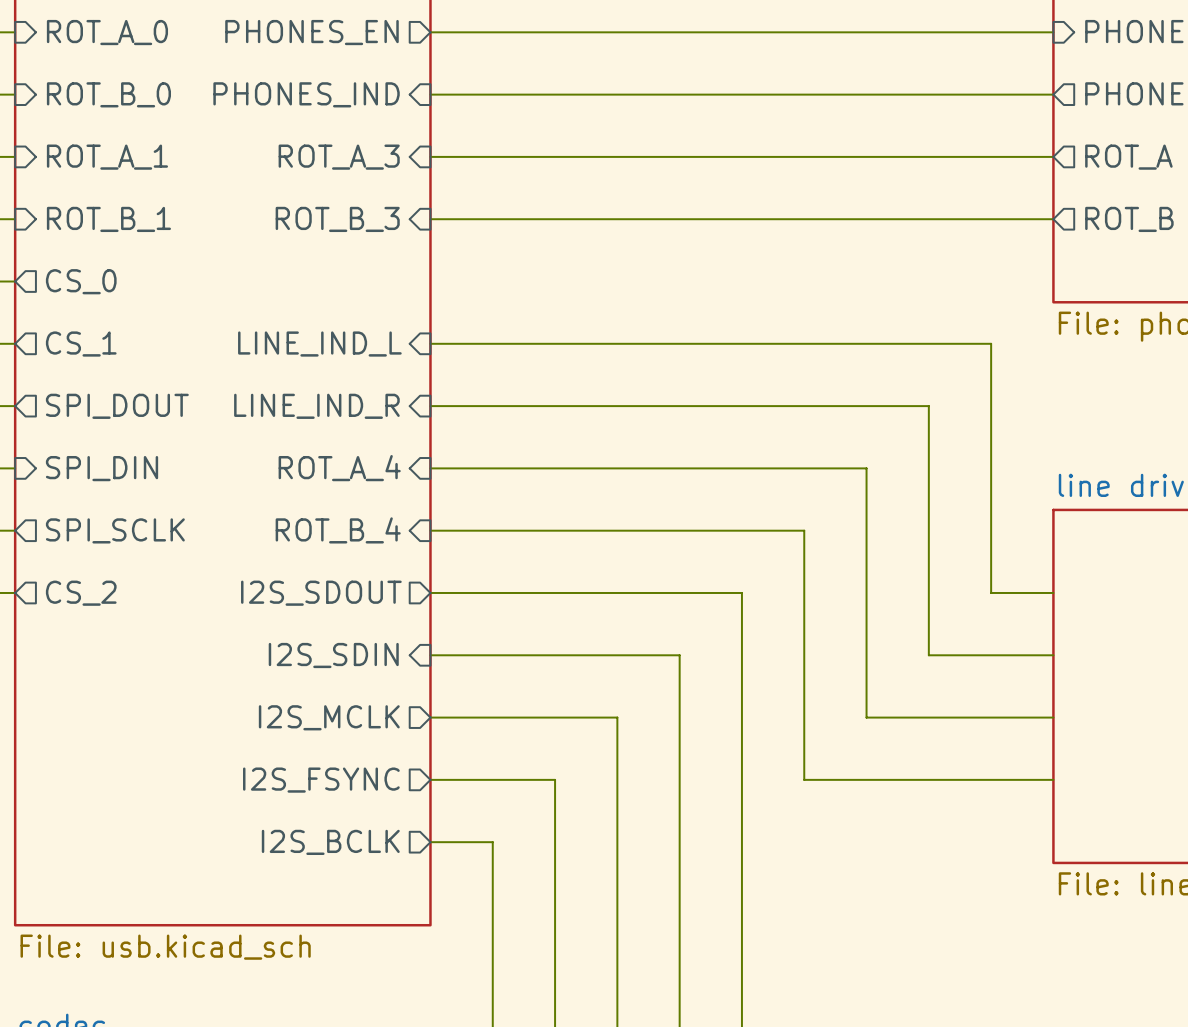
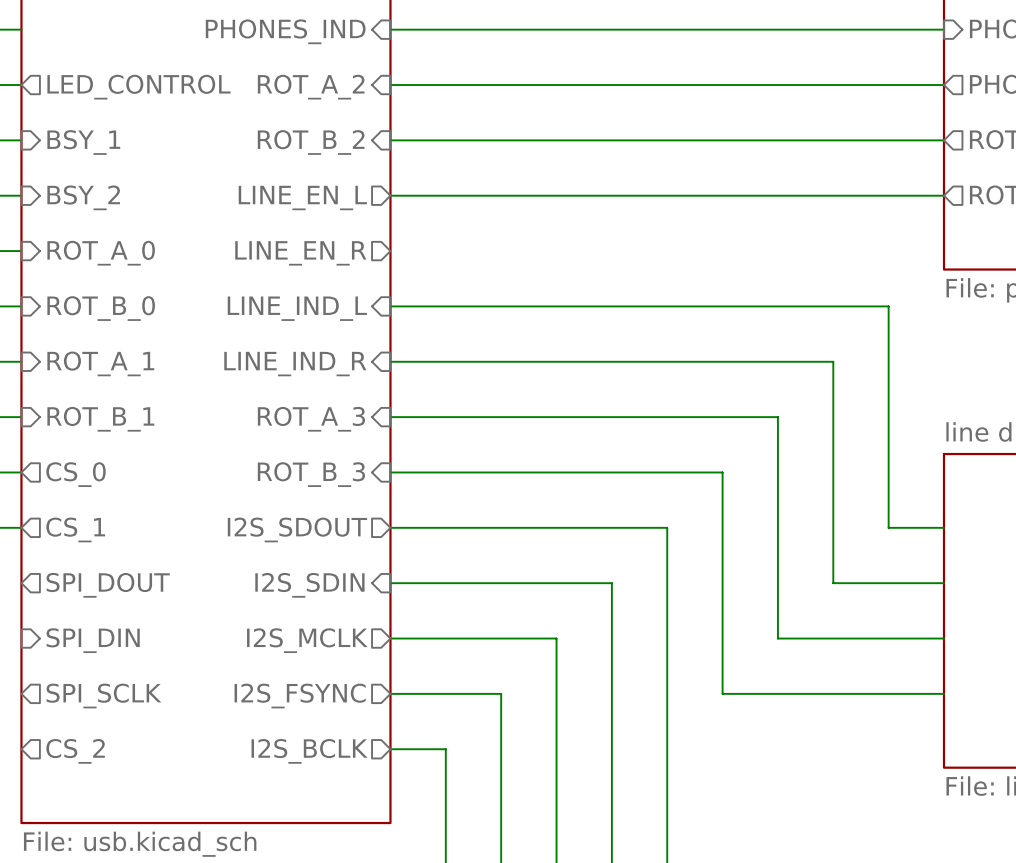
sheet pin: ROT_A_0 (107, 32) -> none
sheet pin shape: output (311, 32) -> input (285, 31)
sheet pin: PHONES_EN (311, 32) -> PHONES_IND (285, 31)
sheet pin shape: input (108, 94) -> output (138, 87)
sheet pin: ROT_B_0 (108, 94) -> LED_CONTROL (138, 87)
sheet pin: PHONES_IND (306, 94) -> ROT_A_2 (311, 87)
sheet pin: ROT_A_1 (107, 157) -> BSY_1 (83, 142)
sheet pin: ROT_A_3 (339, 157) -> ROT_B_2 (311, 142)
sheet pin: ROT_B_1 (108, 219) -> BSY_2 (83, 197)
sheet pin shape: input (337, 219) -> output (302, 198)
sheet pin: ROT_B_3 (337, 219) -> LINE_EN_L (302, 198)
sheet pin shape: output (81, 281) -> input (101, 253)
sheet pin: CS_0 (81, 281) -> ROT_A_0 (101, 253)
sheet pin: none -> LINE_EN_R (300, 253)
sheet pin shape: output (81, 344) -> input (101, 308)
sheet pin: CS_1 (81, 344) -> ROT_B_0 (101, 308)
sheet pin shape: output (117, 406) -> input (100, 363)
sheet pin: SPI_DOUT (117, 406) -> ROT_A_1 (100, 363)
sheet pin: SPI_DIN (102, 468) -> ROT_B_1 (100, 419)
sheet pin: ROT_A_4 (339, 468) -> ROT_A_3 (311, 419)
sheet pin: SPI_SCLK (115, 530) -> CS_0 (76, 474)
sheet pin: ROT_B_4 (338, 530) -> ROT_B_3 (311, 474)
sheet pin: CS_2 (81, 593) -> CS_1 (75, 529)
sheet pin: none -> SPI_DOUT (108, 585)
sheet pin: none -> SPI_DIN (93, 640)
sheet pin: none -> SPI_SCLK (103, 696)
sheet pin: none -> CS_2 (75, 751)

